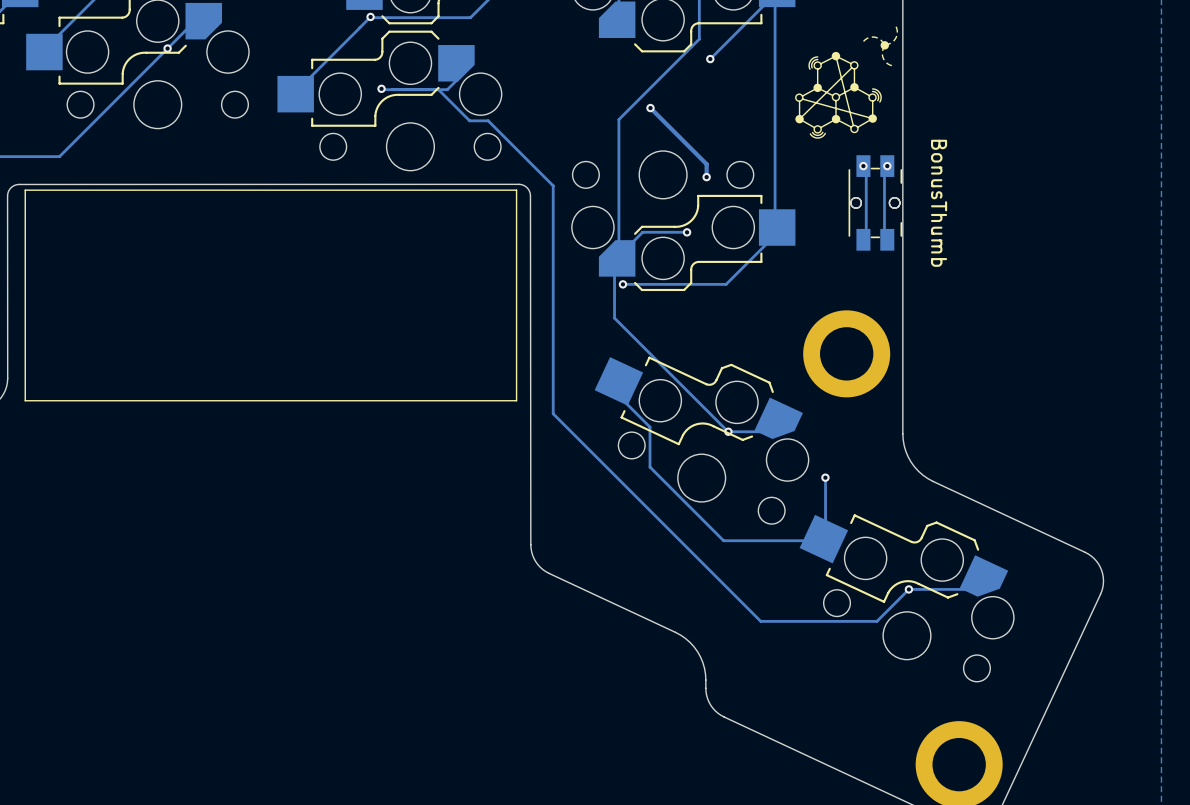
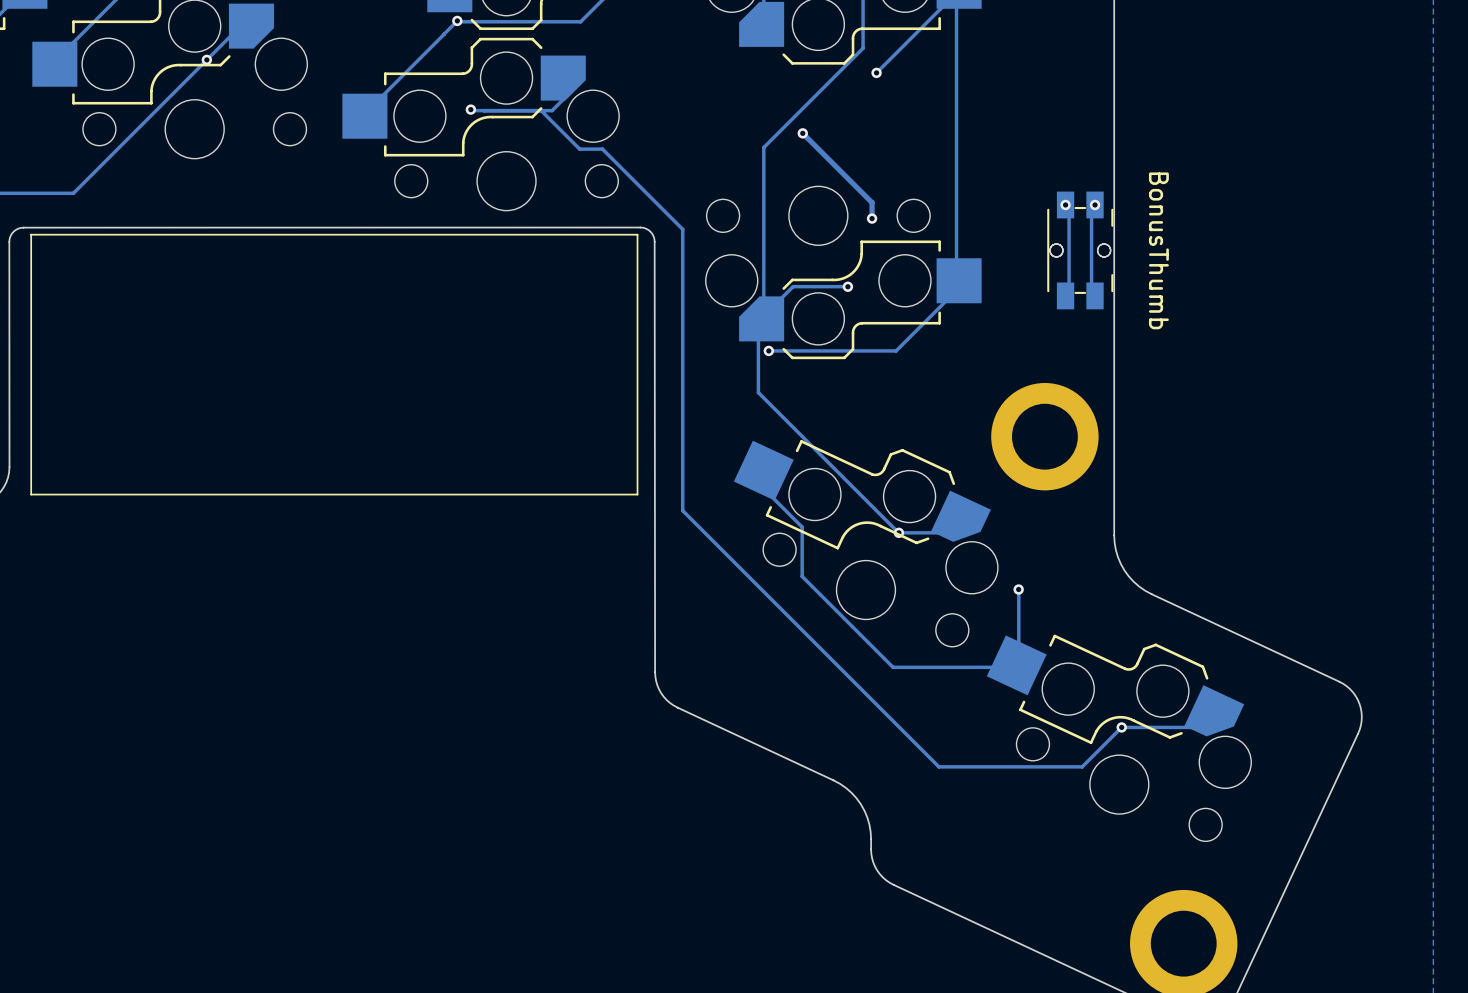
line: (895, 25) (897, 31) (895, 38) (890, 43) (884, 44) -> none
drawing: [880, 41, 889, 50] -> none
line: (862, 42) (868, 37) (874, 37) (880, 40) (884, 44) -> none
line: (885, 45) (882, 52) (883, 58) (886, 63) (893, 65) -> none
drawing: [795, 51, 877, 134] -> none
line: (817, 56) (810, 60) (809, 69) -> none
line: (835, 56) (820, 63) -> none
line: (835, 56) (851, 63) -> none
line: (835, 56) (853, 125) -> none
line: (817, 59) (812, 62) (812, 67) -> none
line: (851, 67) (799, 119) (799, 101) -> none
line: (817, 69) (817, 87) -> none
line: (854, 69) (854, 87) -> none
line: (817, 87) (832, 95) -> none
line: (817, 87) (802, 96) -> none
line: (854, 87) (839, 95) -> none
line: (854, 87) (869, 95) -> none
line: (872, 88) (880, 93) (879, 102) -> none
line: (872, 91) (877, 94) (877, 100) -> none
line: (802, 99) (872, 118) -> none
line: (835, 100) (836, 119) -> none
line: (872, 101) (872, 118) -> none
line: (872, 118) (857, 127) -> none
line: (799, 119) (814, 127) -> none
line: (836, 119) (851, 127) -> none
line: (836, 119) (821, 127) -> none
line: (822, 132) (817, 135) (812, 132) -> none
line: (825, 133) (817, 138) (810, 133) -> none

